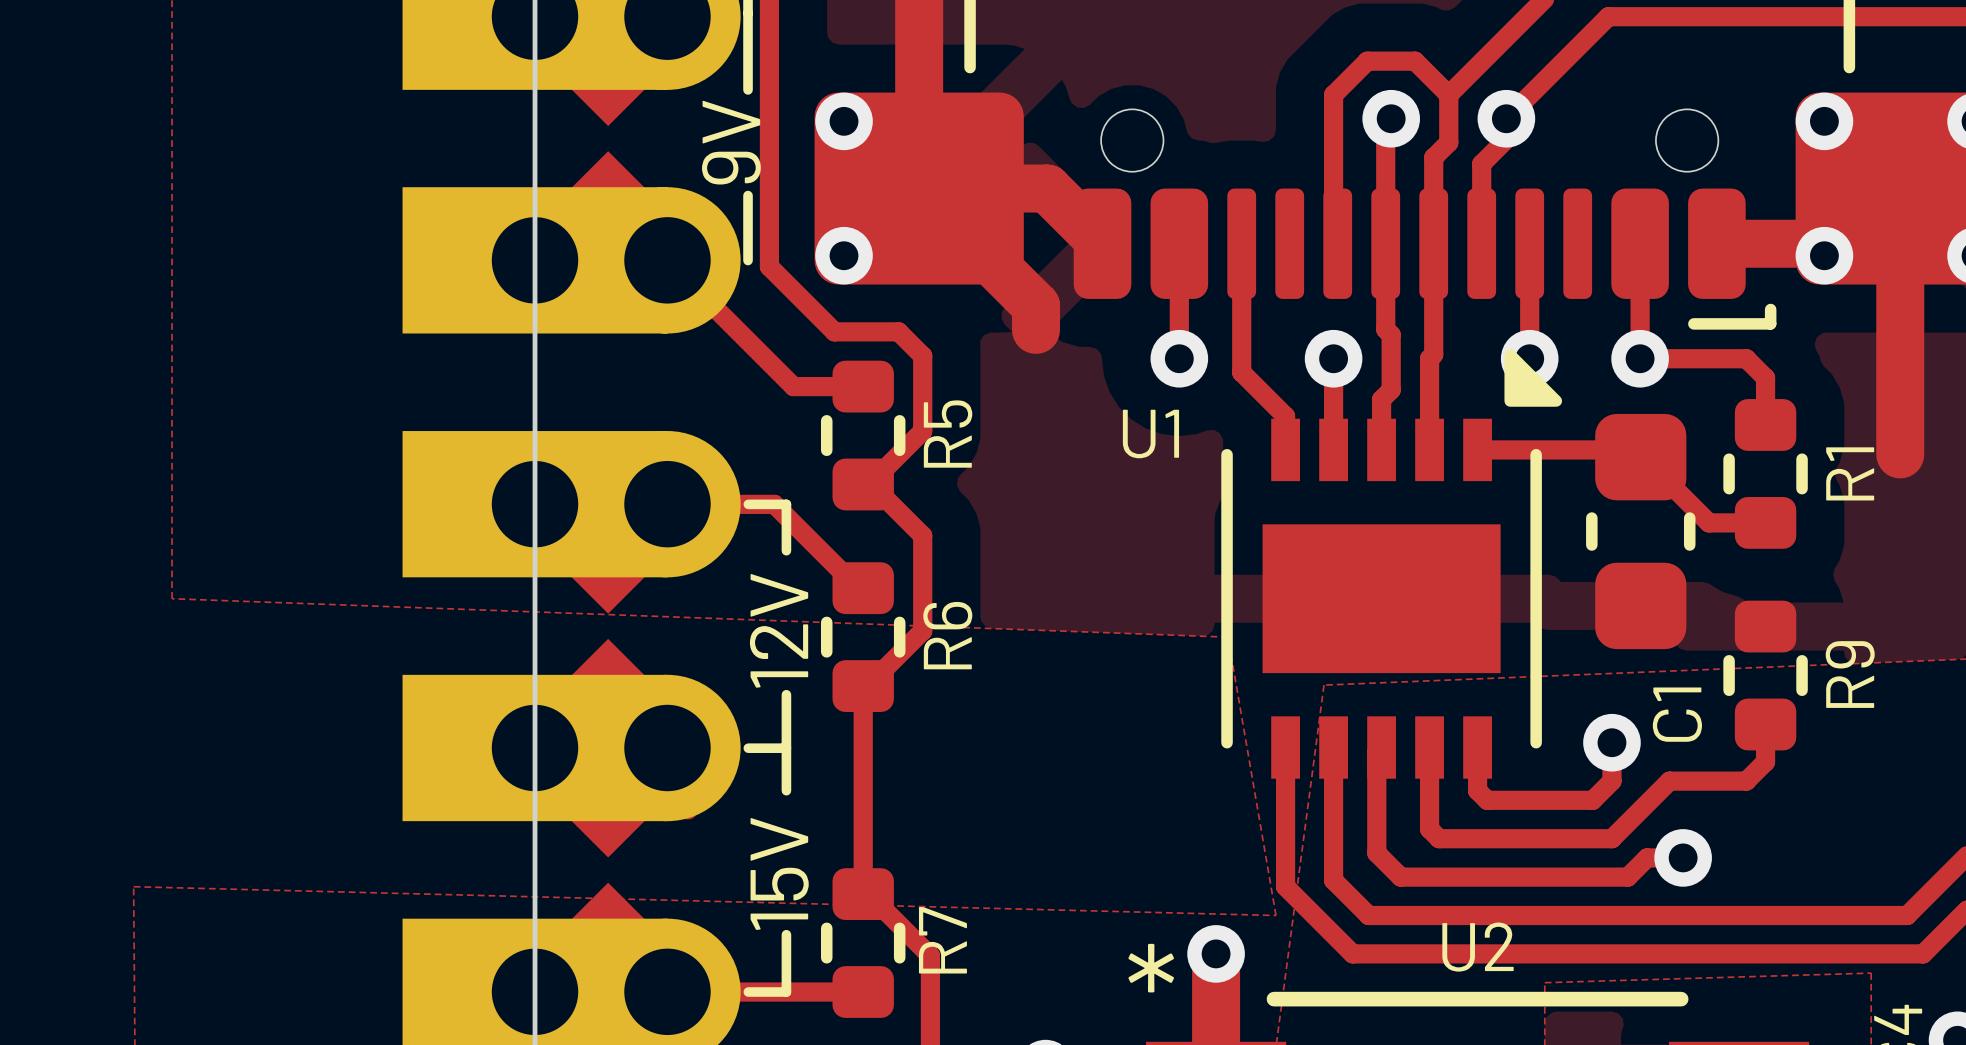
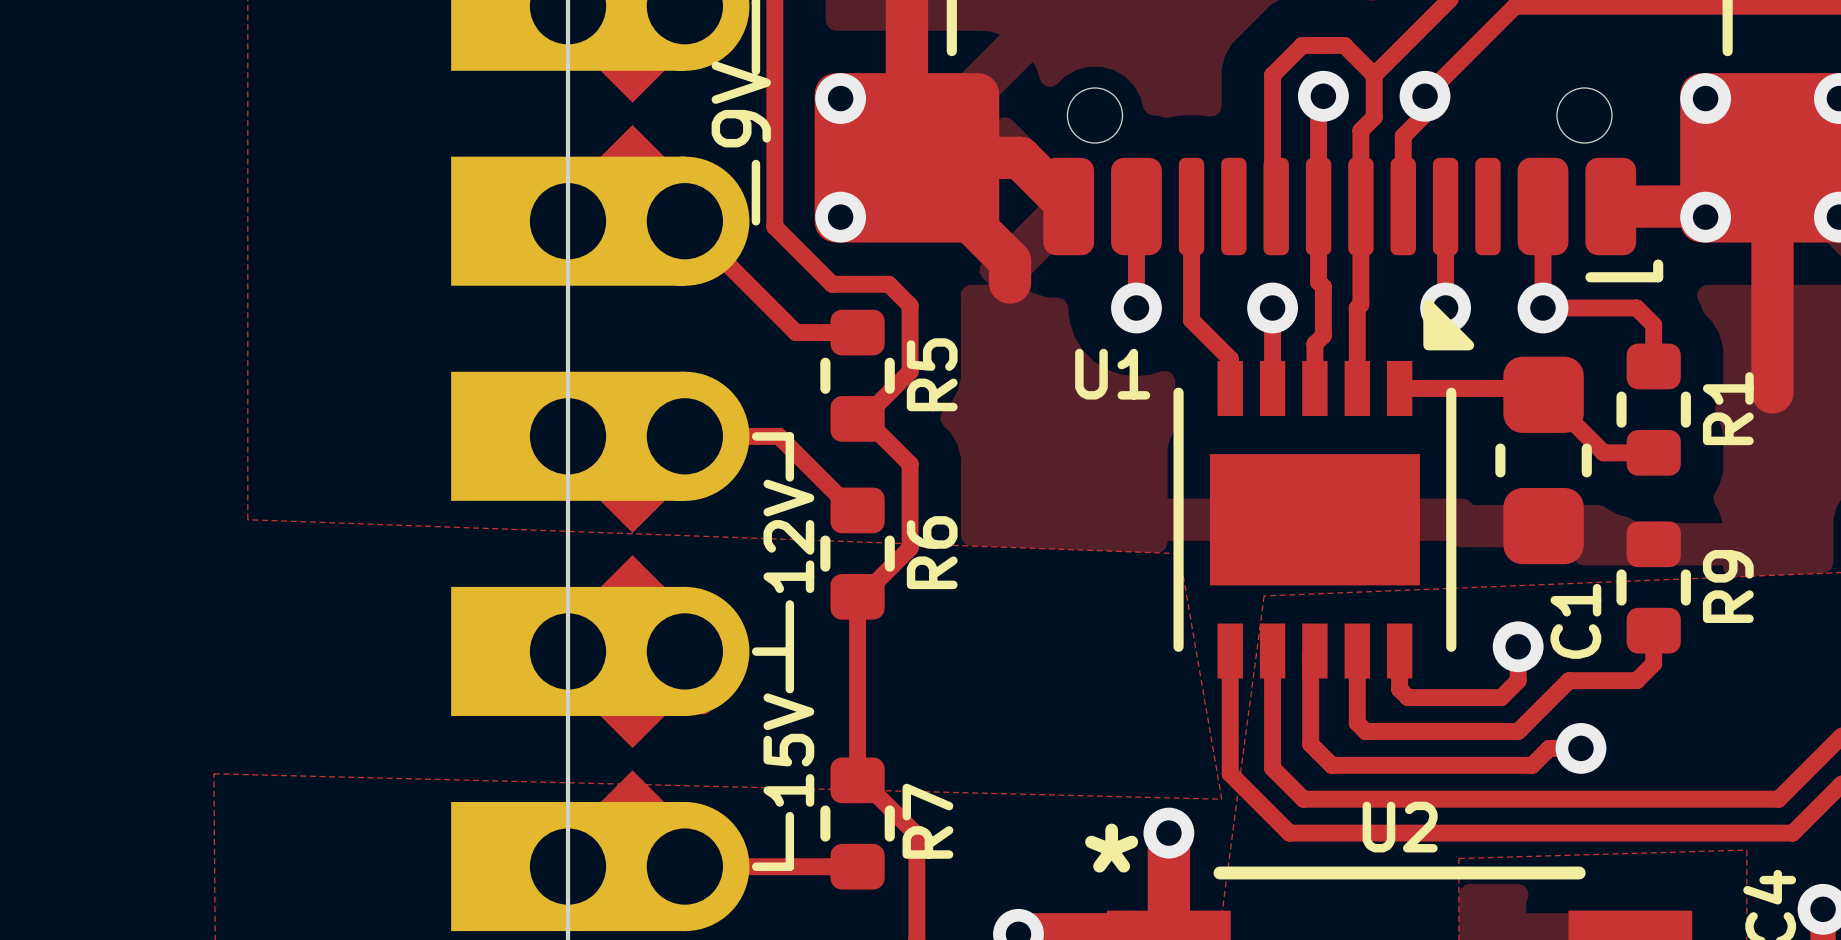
text position: 12V (779, 630) -> 12V (788, 536)
text position: 15V (779, 873) -> 15V (788, 750)

